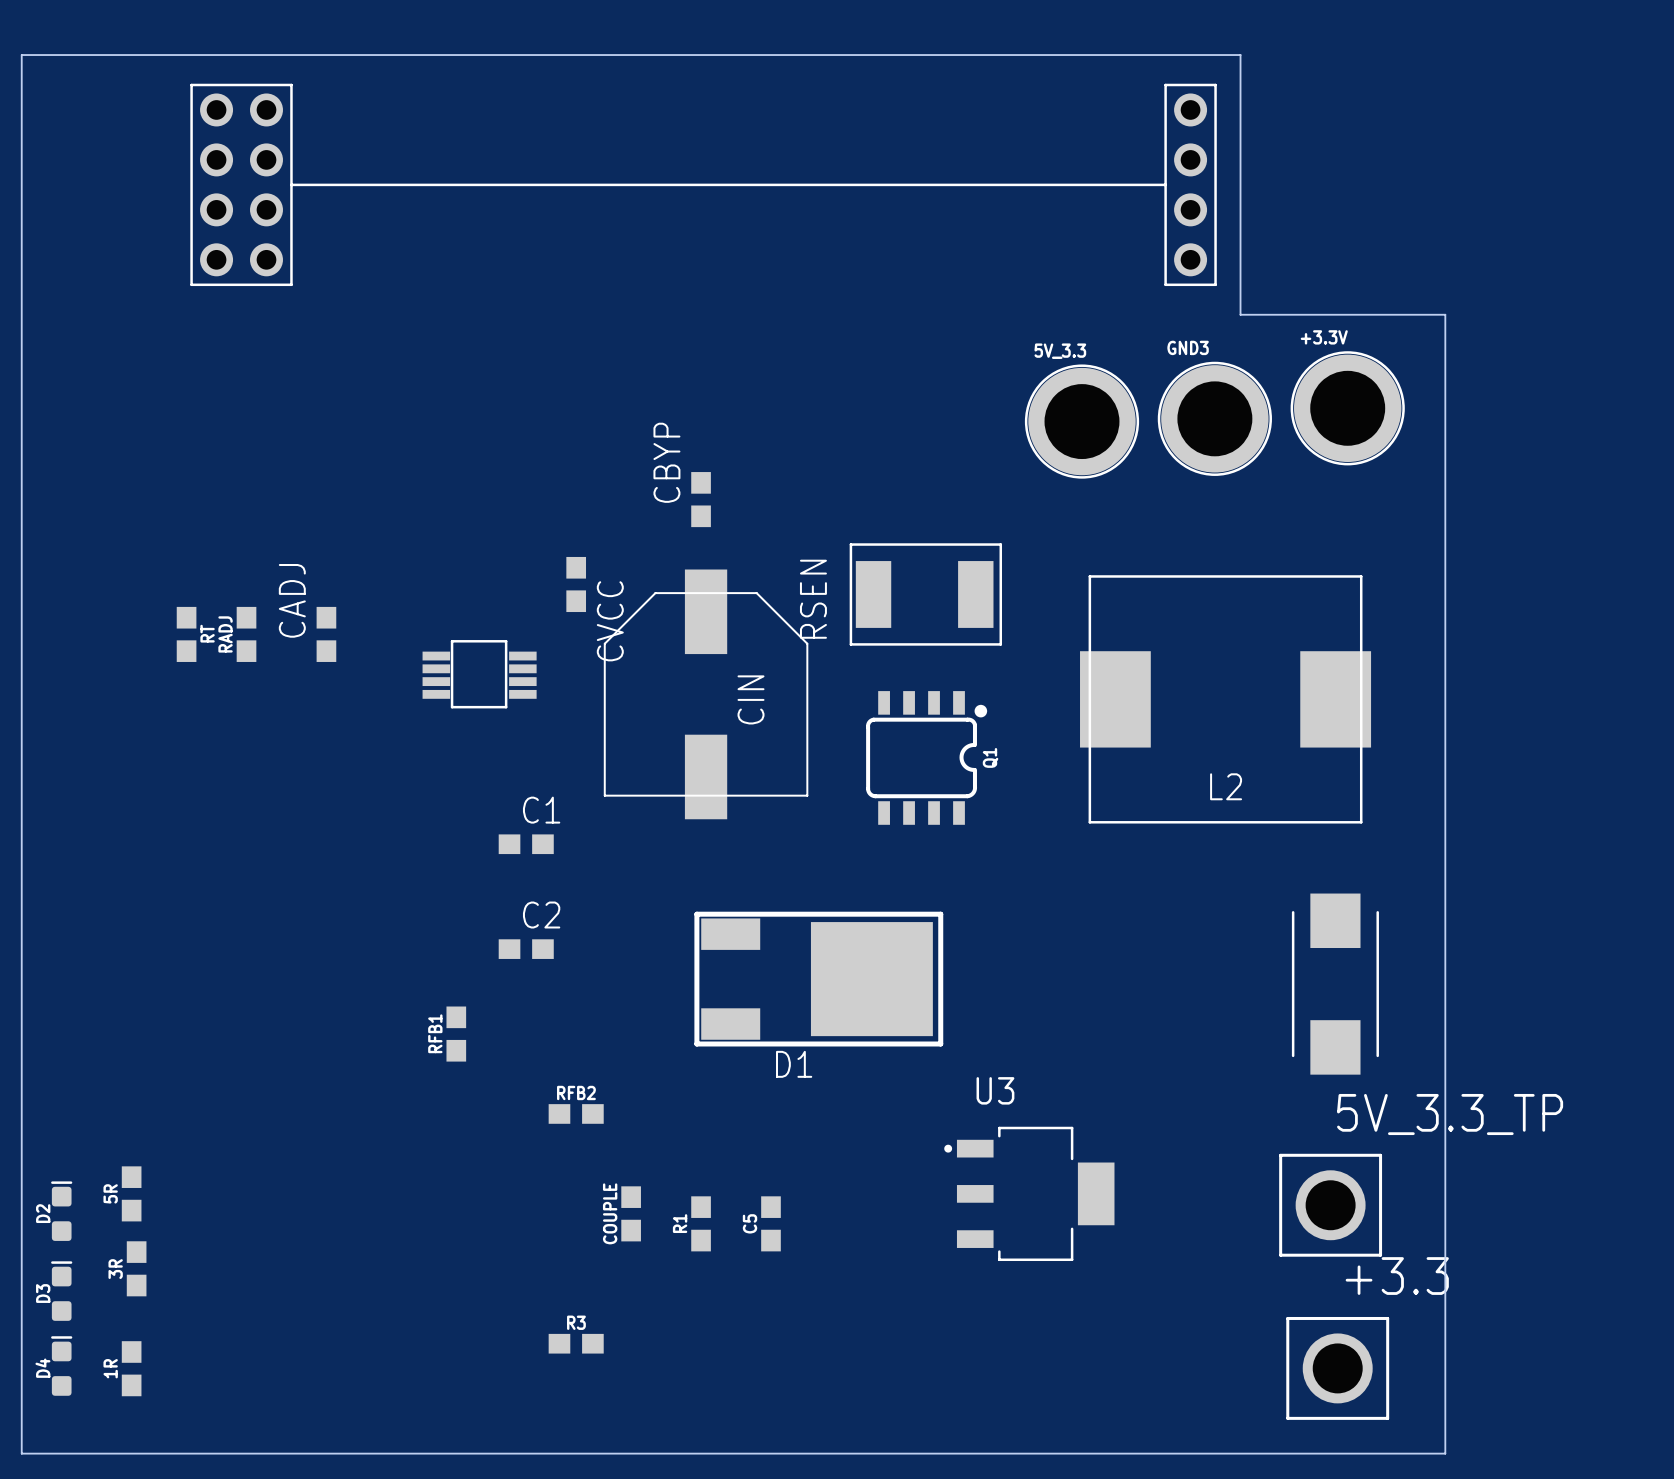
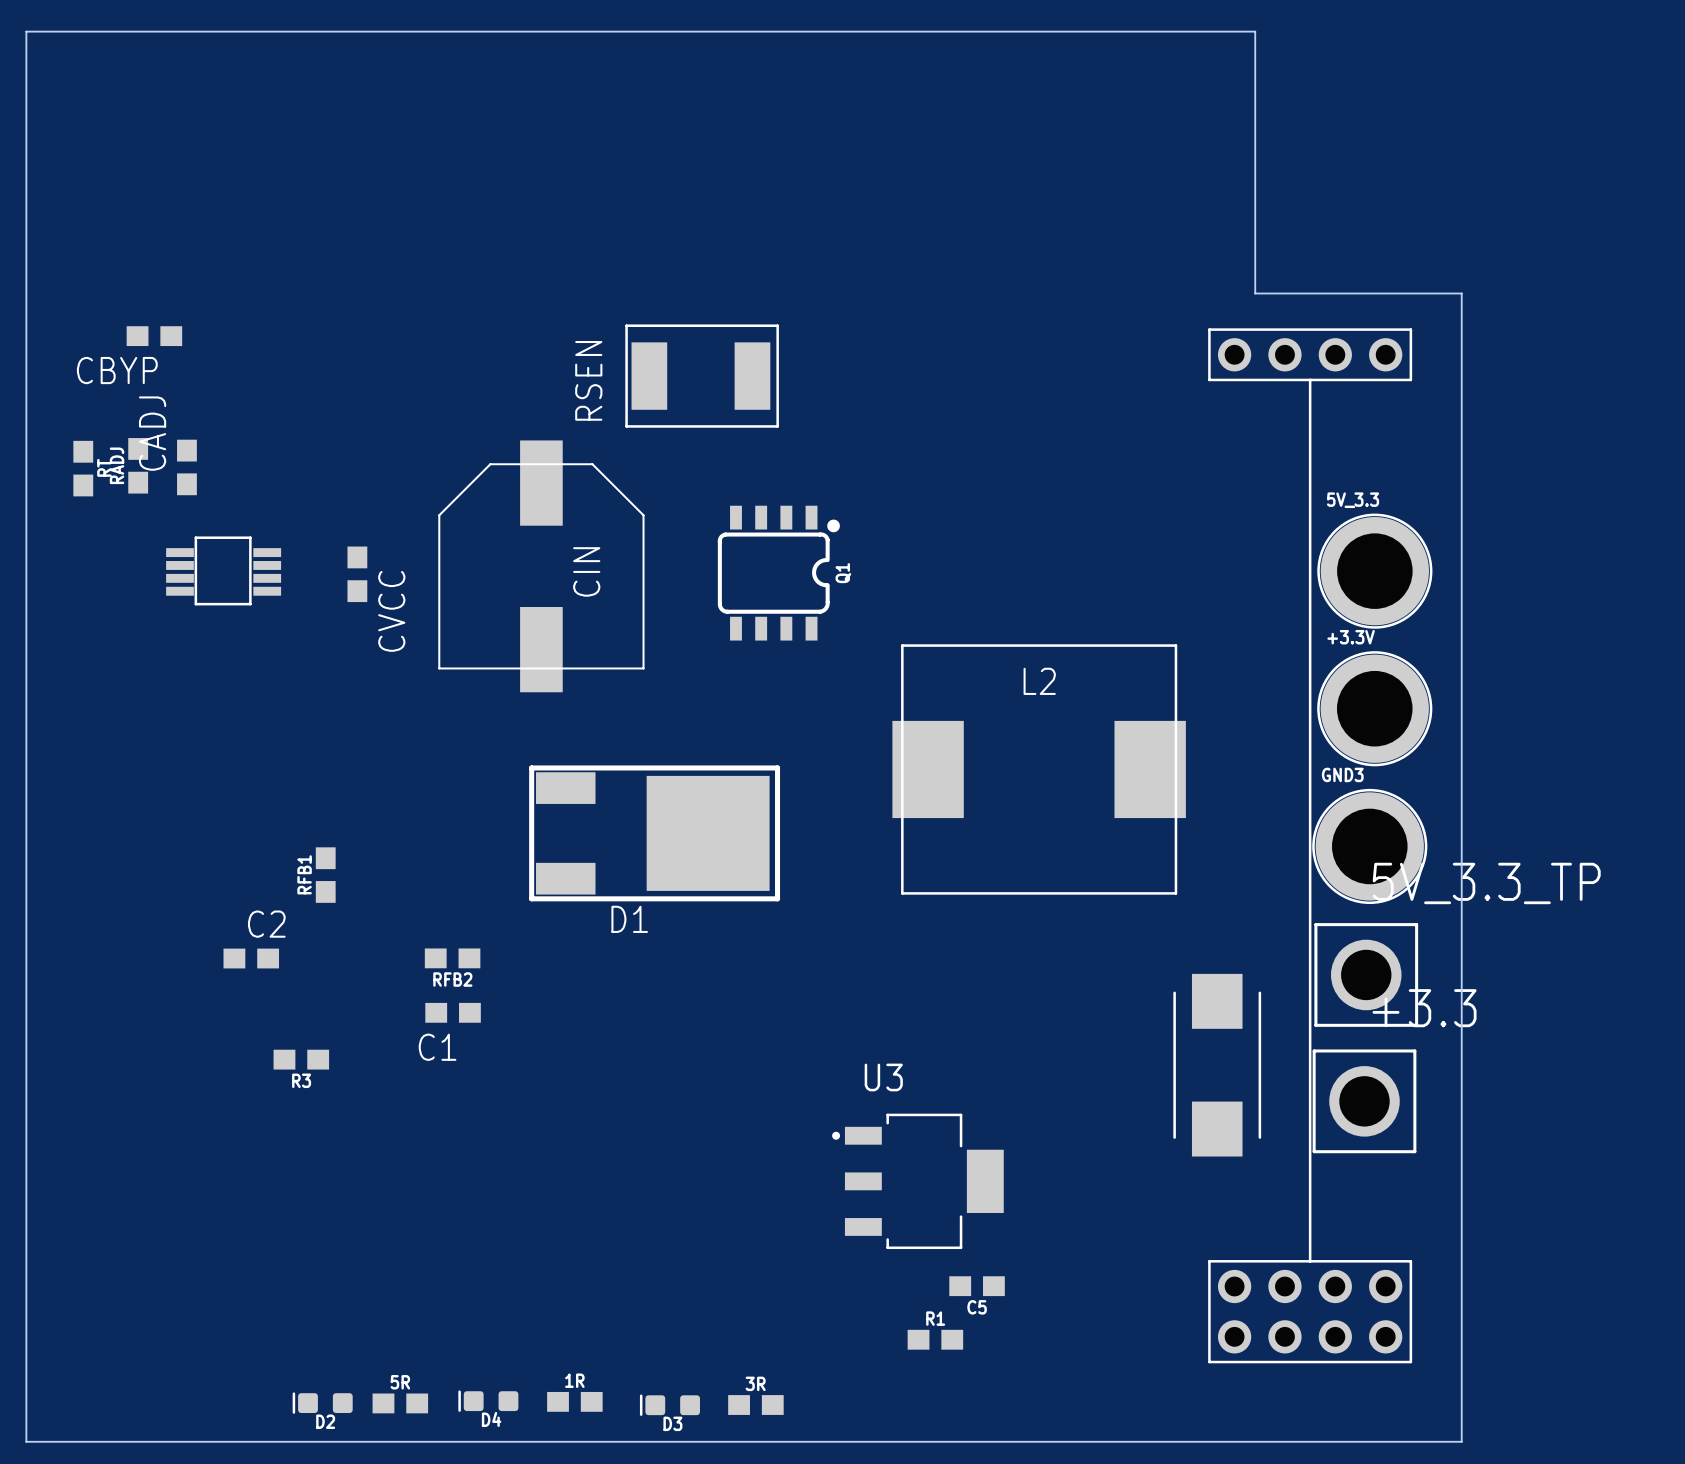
part: (703, 184) -> none
CBYP: none -> (154, 336)
+3.3V position: (1347, 408) -> (1374, 708)
GND3 position: (1214, 418) -> (1369, 846)
5V_3.3 position: (1081, 421) -> (1374, 571)
CBYP: (701, 499) -> none
CVCC position: (576, 584) -> (357, 574)
RSEN position: (925, 594) -> (702, 376)
RT position: (186, 634) -> (83, 468)
RADJ position: (246, 634) -> (138, 465)
CADJ position: (326, 634) -> (186, 467)
part position: (479, 674) -> (223, 570)
CIN position: (706, 694) -> (541, 566)
L2 position: (1225, 699) -> (1039, 769)
Q1 position: (926, 757) -> (778, 573)
L2 name position: L2 (1226, 786) -> L2 (1039, 681)
C1 name position: C1 (541, 810) -> C1 (437, 1047)
C1 position: (526, 844) -> (453, 1012)
part: none -> (1310, 845)
C2 position: (526, 949) -> (251, 958)
D1 position: (818, 979) -> (654, 833)
part position: (1335, 984) -> (1217, 1065)
RFB1 position: (456, 1034) -> (325, 875)
RFB2 name position: RFB2 (576, 1092) -> RFB2 (452, 979)
RFB2 position: (576, 1113) -> (452, 958)
5R rotation: 0° (131, 1193) -> 90° clockwise (400, 1403)
5R position: (131, 1193) -> (400, 1403)
U3 position: (1029, 1193) -> (917, 1181)
5V_3.3_TP position: (1330, 1205) -> (1366, 974)
D2 rotation: 0° (61, 1211) -> 90° counterclockwise (322, 1403)
D2 position: (61, 1211) -> (322, 1403)
COUPLE: (631, 1213) -> none
R1 rotation: 0° (701, 1223) -> 90° clockwise (935, 1339)
R1 position: (701, 1223) -> (935, 1339)
C5 rotation: 0° (770, 1223) -> 90° clockwise (977, 1286)
C5 position: (770, 1223) -> (977, 1286)
3R rotation: 0° (136, 1268) -> 90° clockwise (755, 1405)
3R position: (136, 1268) -> (755, 1405)
D3 rotation: 0° (61, 1291) -> 90° counterclockwise (669, 1405)
D3 position: (61, 1291) -> (669, 1405)
R3 name position: R3 (576, 1322) -> R3 (301, 1080)
R3 position: (576, 1343) -> (301, 1059)
D4 rotation: 0° (61, 1366) -> 90° counterclockwise (488, 1401)
D4 position: (61, 1366) -> (488, 1401)
1R rotation: 0° (131, 1368) -> 90° clockwise (574, 1401)
1R position: (131, 1368) -> (574, 1401)
+3.3 position: (1337, 1368) -> (1364, 1101)

